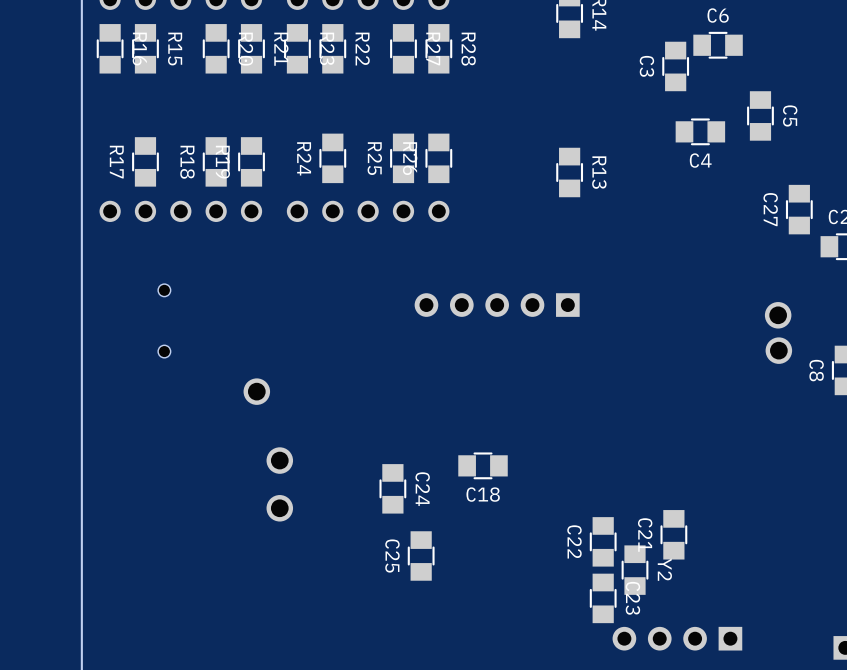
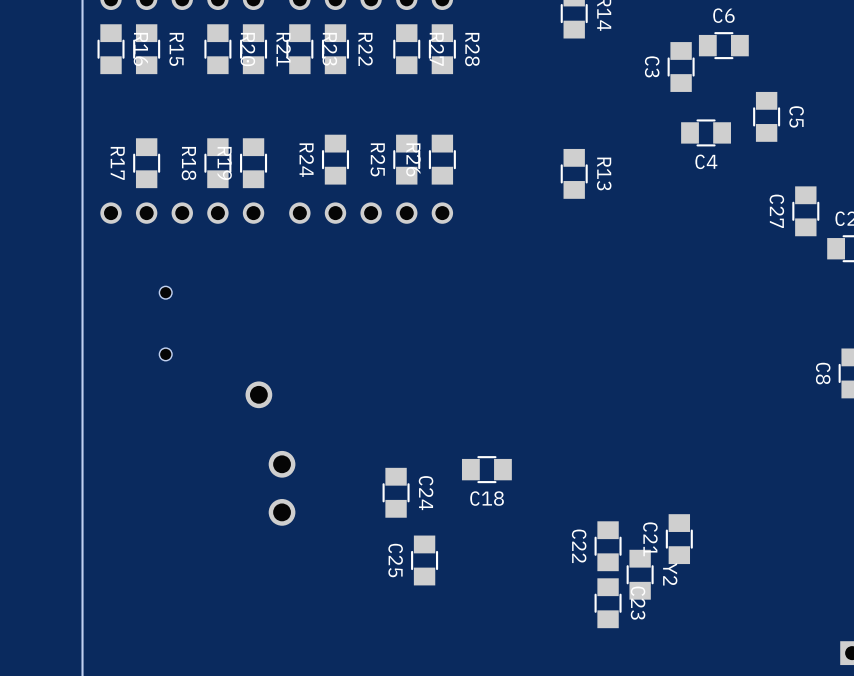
part: (497, 305) -> none
part: (778, 315) -> none
part: (778, 350) -> none
part: (677, 638) -> none

